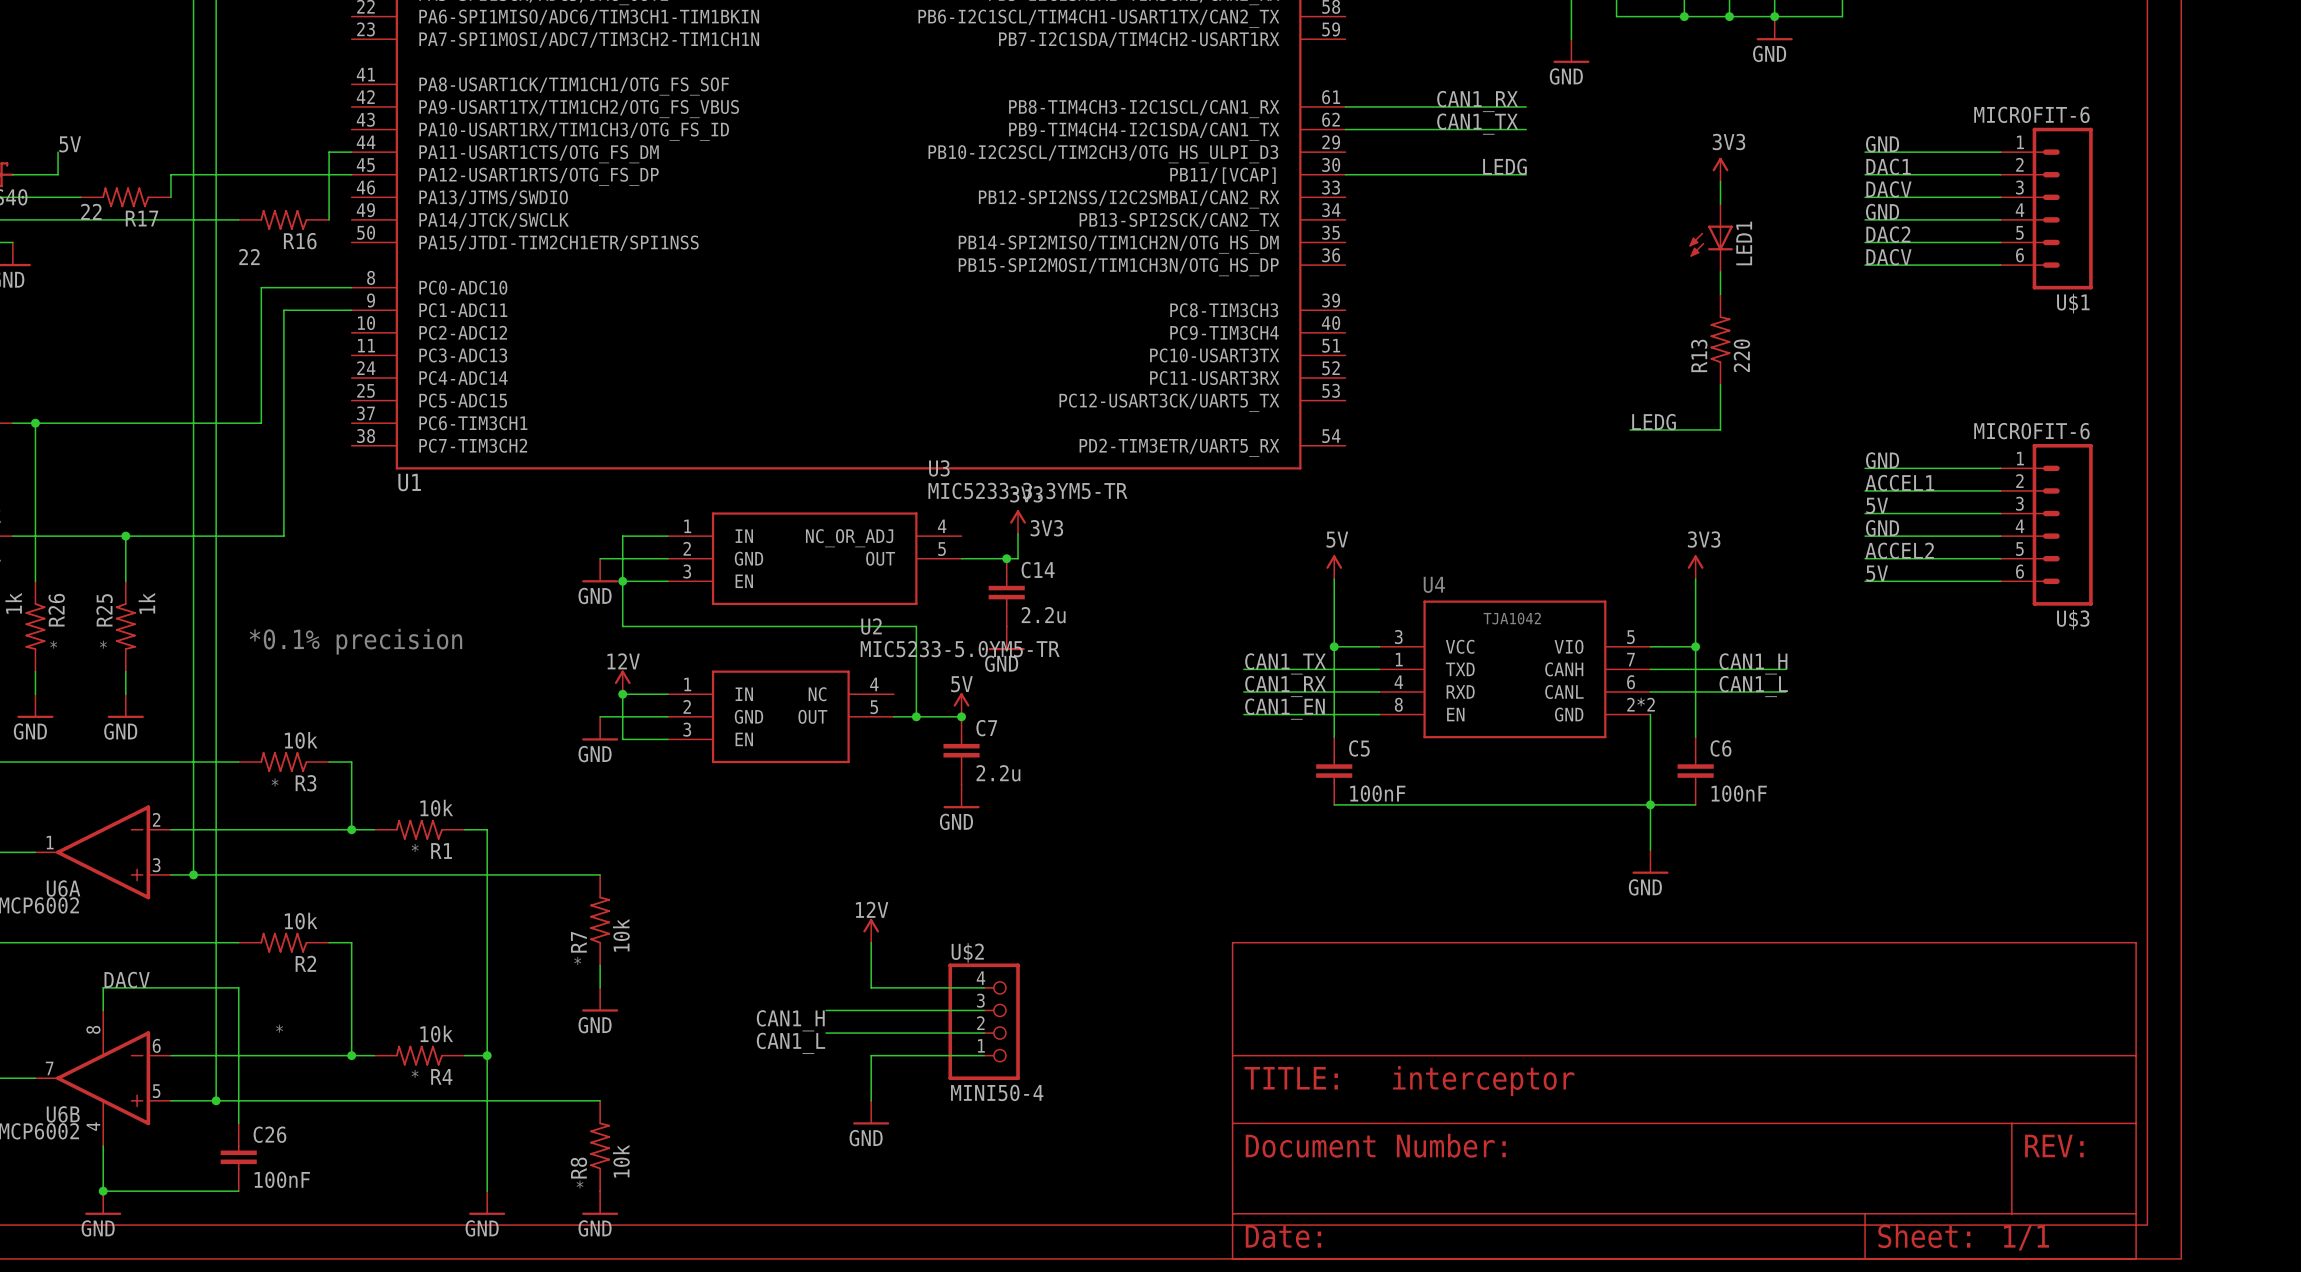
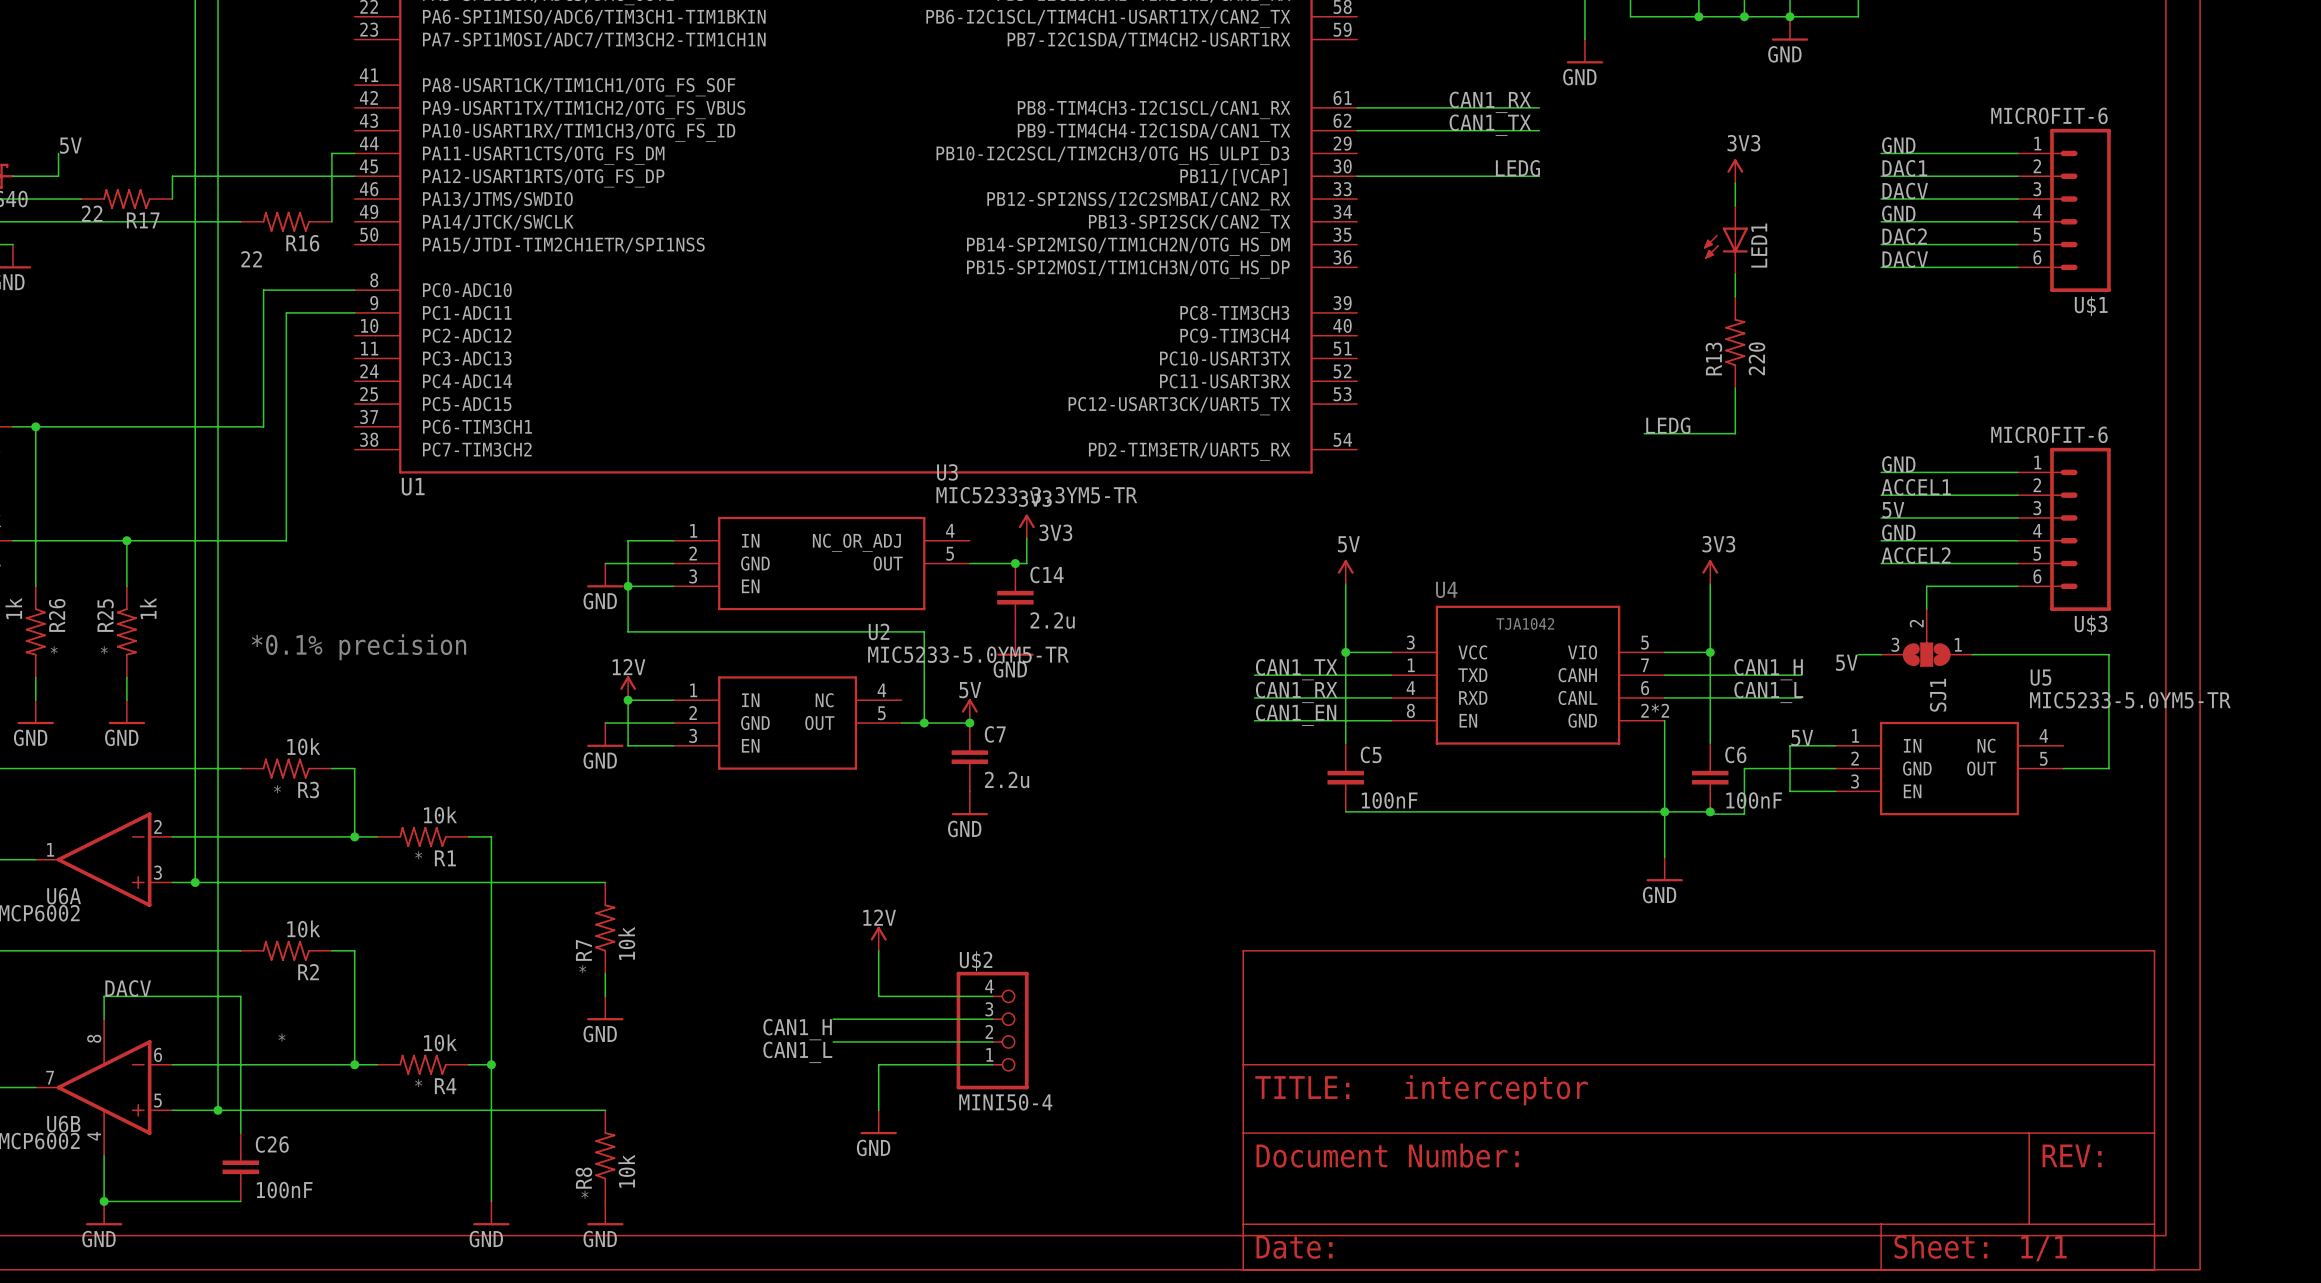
label position: 5V (1877, 573) -> 5V (1846, 662)
wire: (1865, 581) (1910, 581) -> (1926, 609) (1926, 586)
SJ1: none -> (1926, 637)
wire: none -> (1858, 654) (1881, 654)
wire: none -> (1972, 654) (2108, 654) (2108, 768) (2063, 768)
label: none -> 5V (1802, 737)
wire: none -> (1835, 745) (1790, 745) (1790, 791) (1835, 791)
wire: none -> (1835, 768) (1744, 768) (1744, 814) (1710, 814) (1710, 811)
U5: none -> MIC5233-5.0YM5-TR (1949, 768)
junction: none -> (1710, 811)

